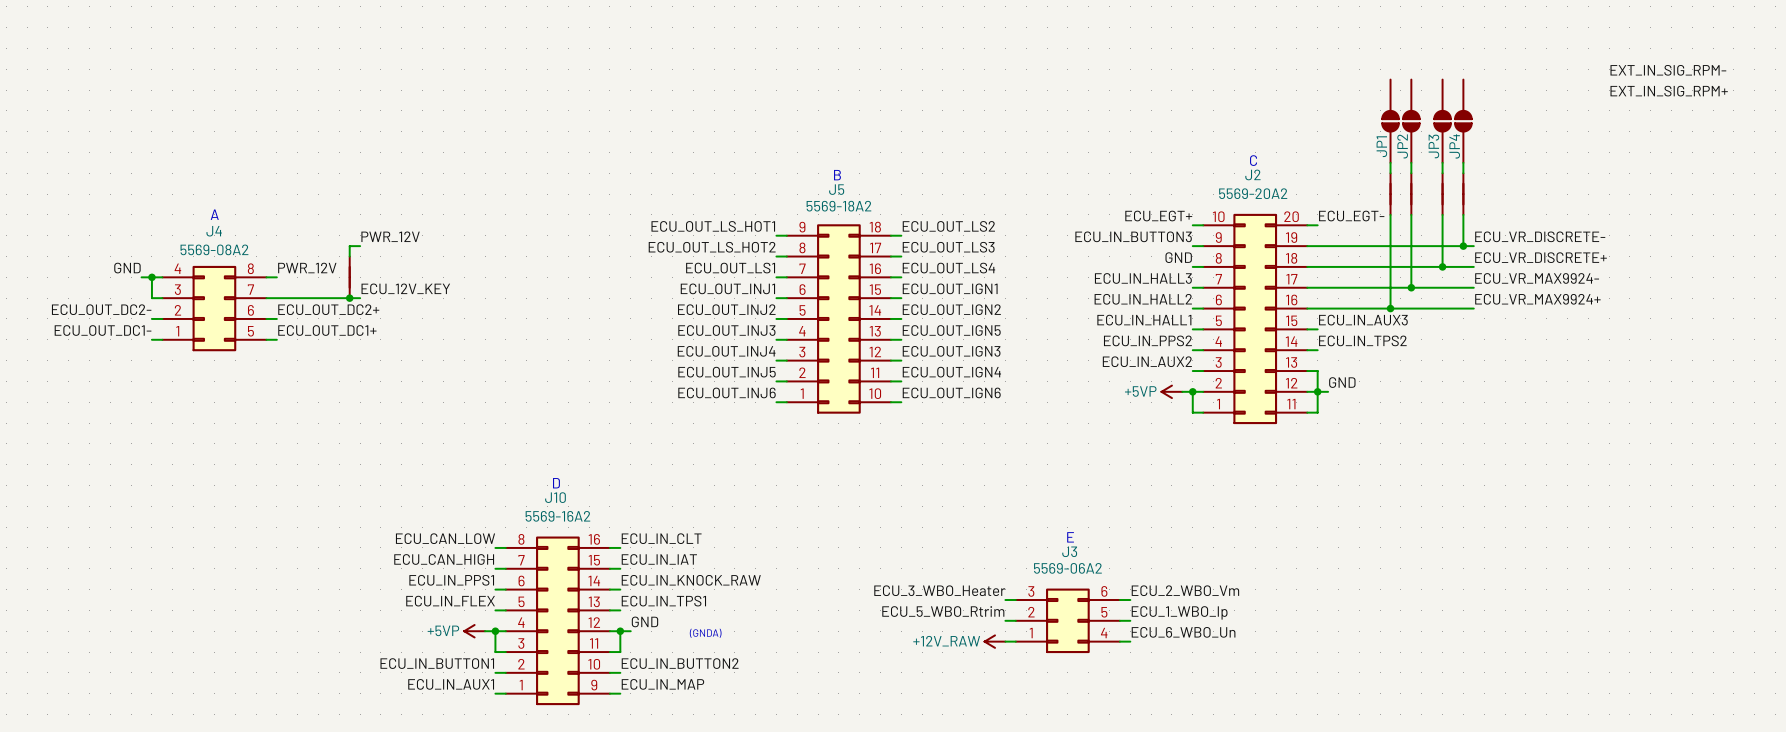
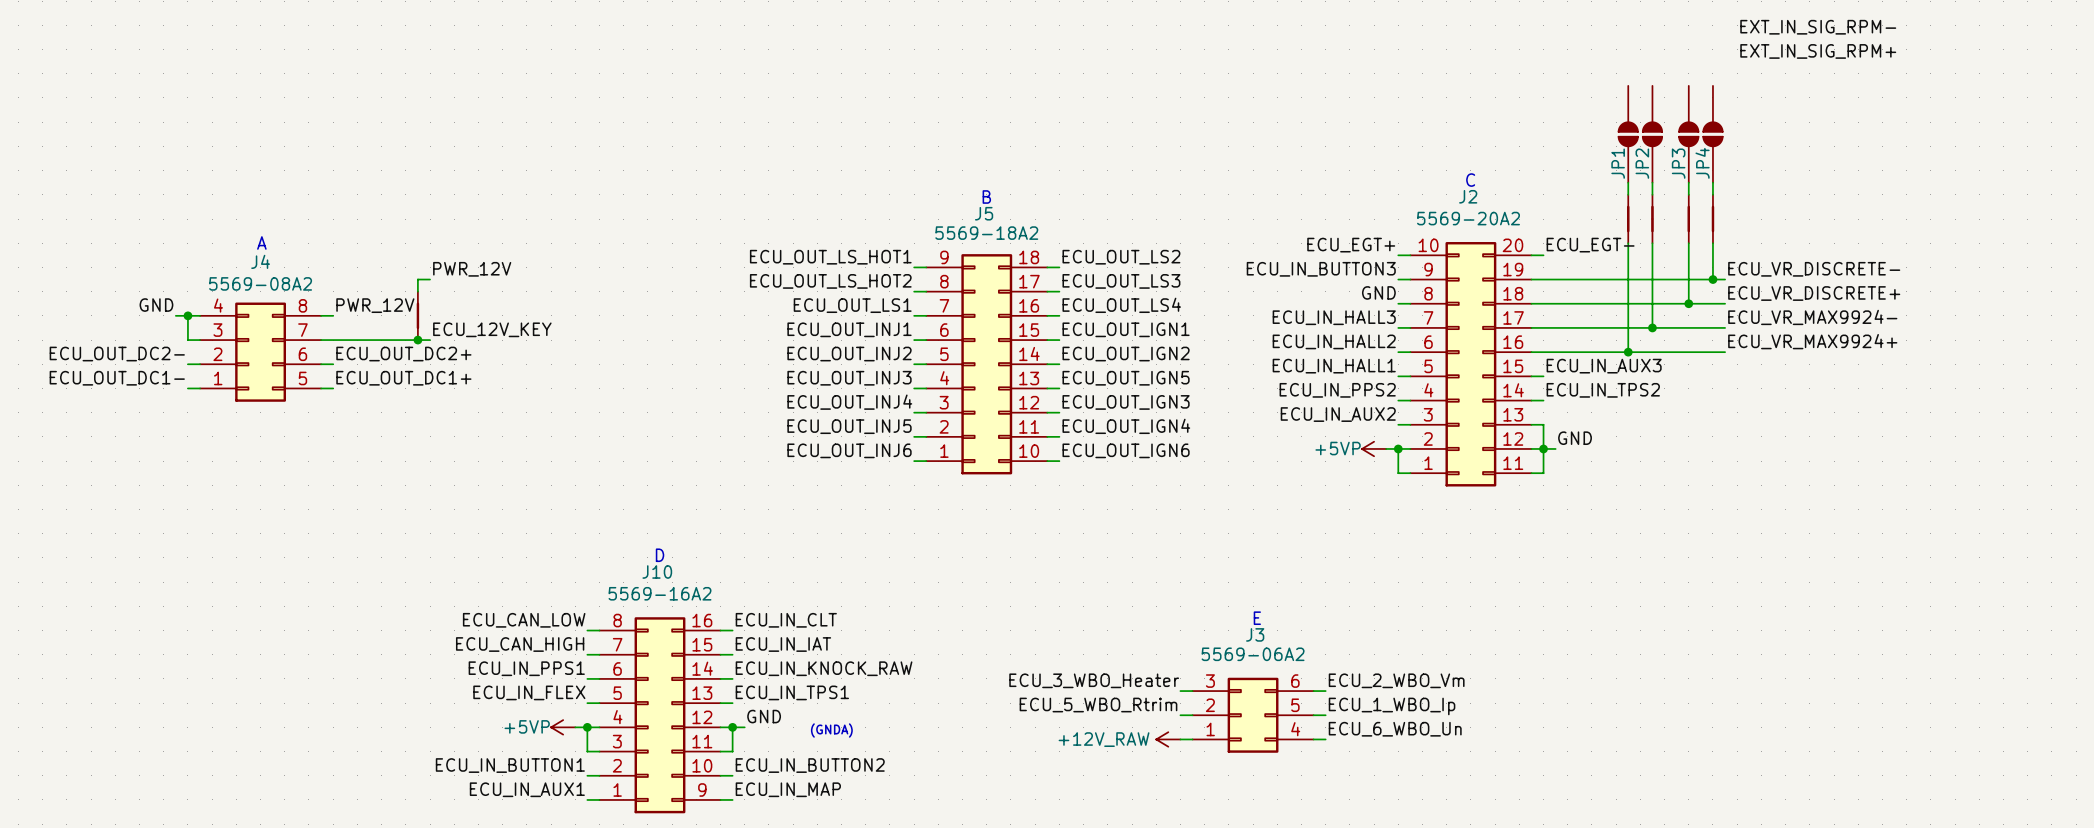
label position: EXT_IN_SIG_RPM- (1668, 70) -> EXT_IN_SIG_RPM- (1818, 27)
label position: EXT_IN_SIG_RPM+ (1669, 91) -> EXT_IN_SIG_RPM+ (1818, 51)

